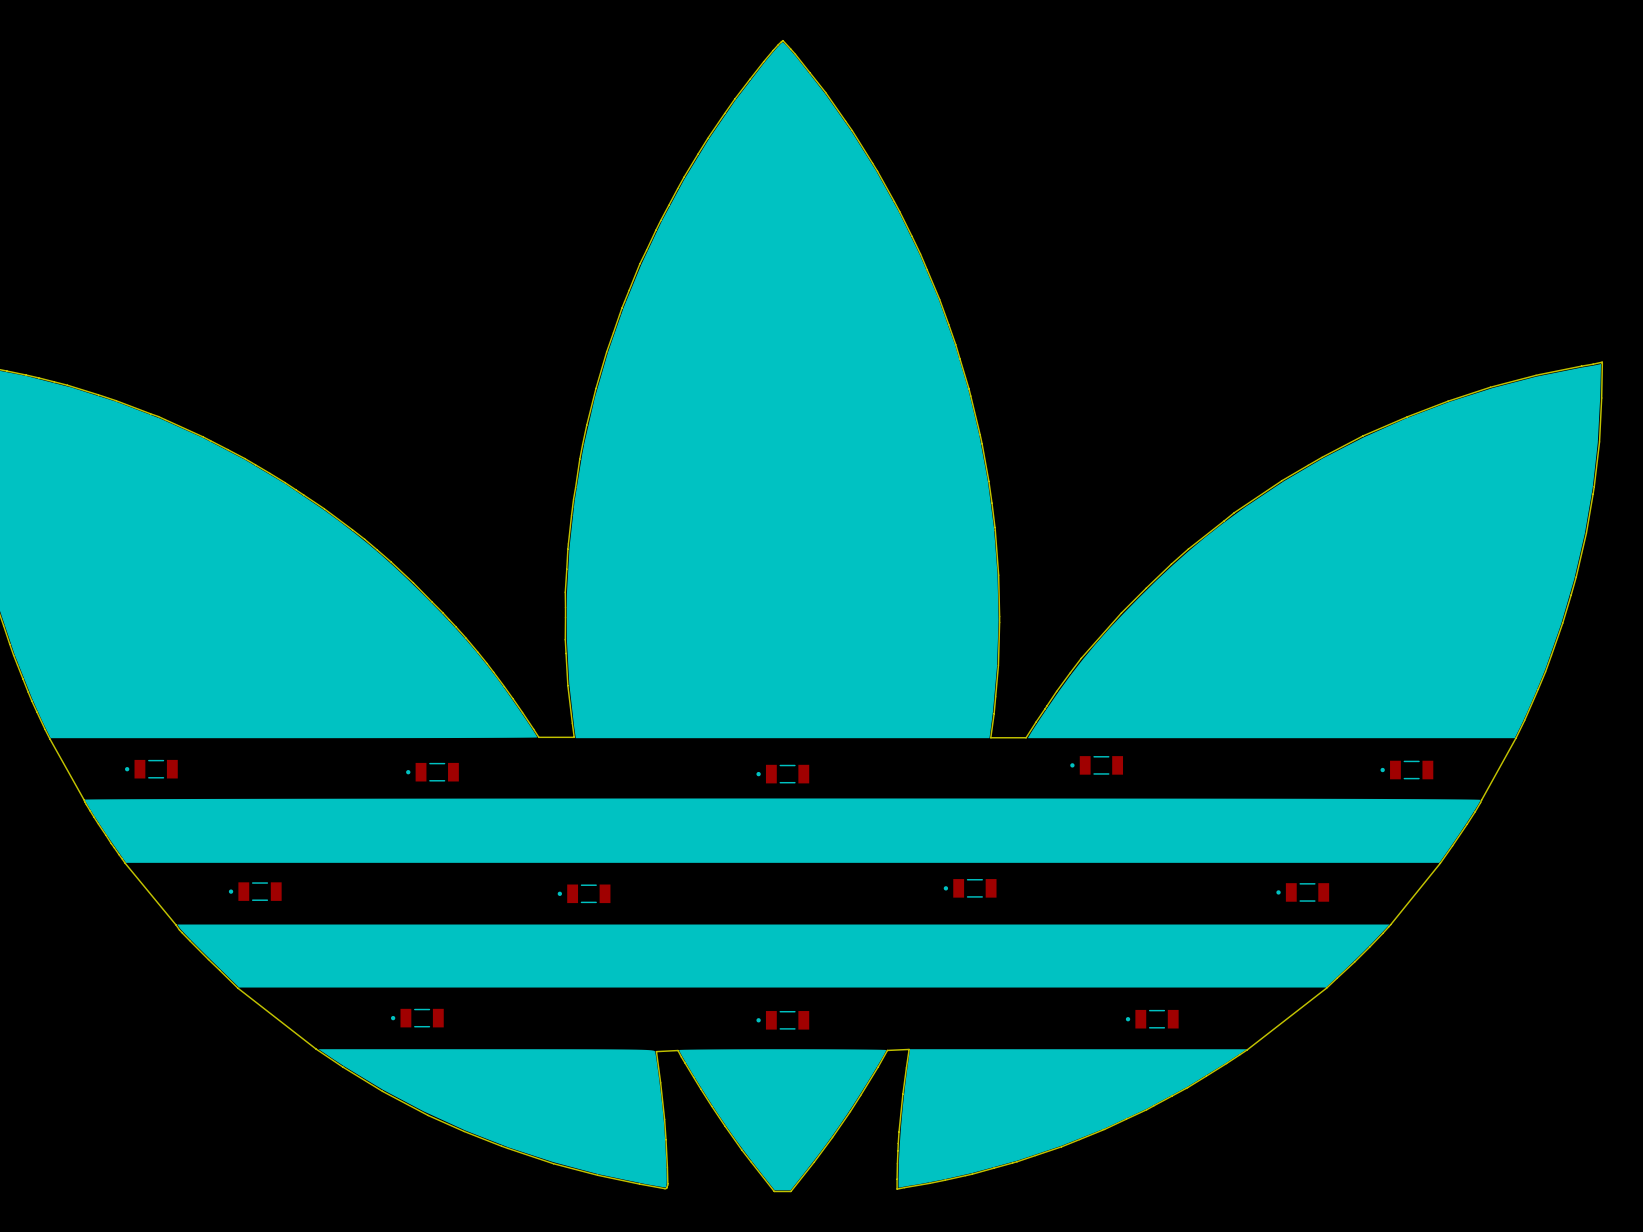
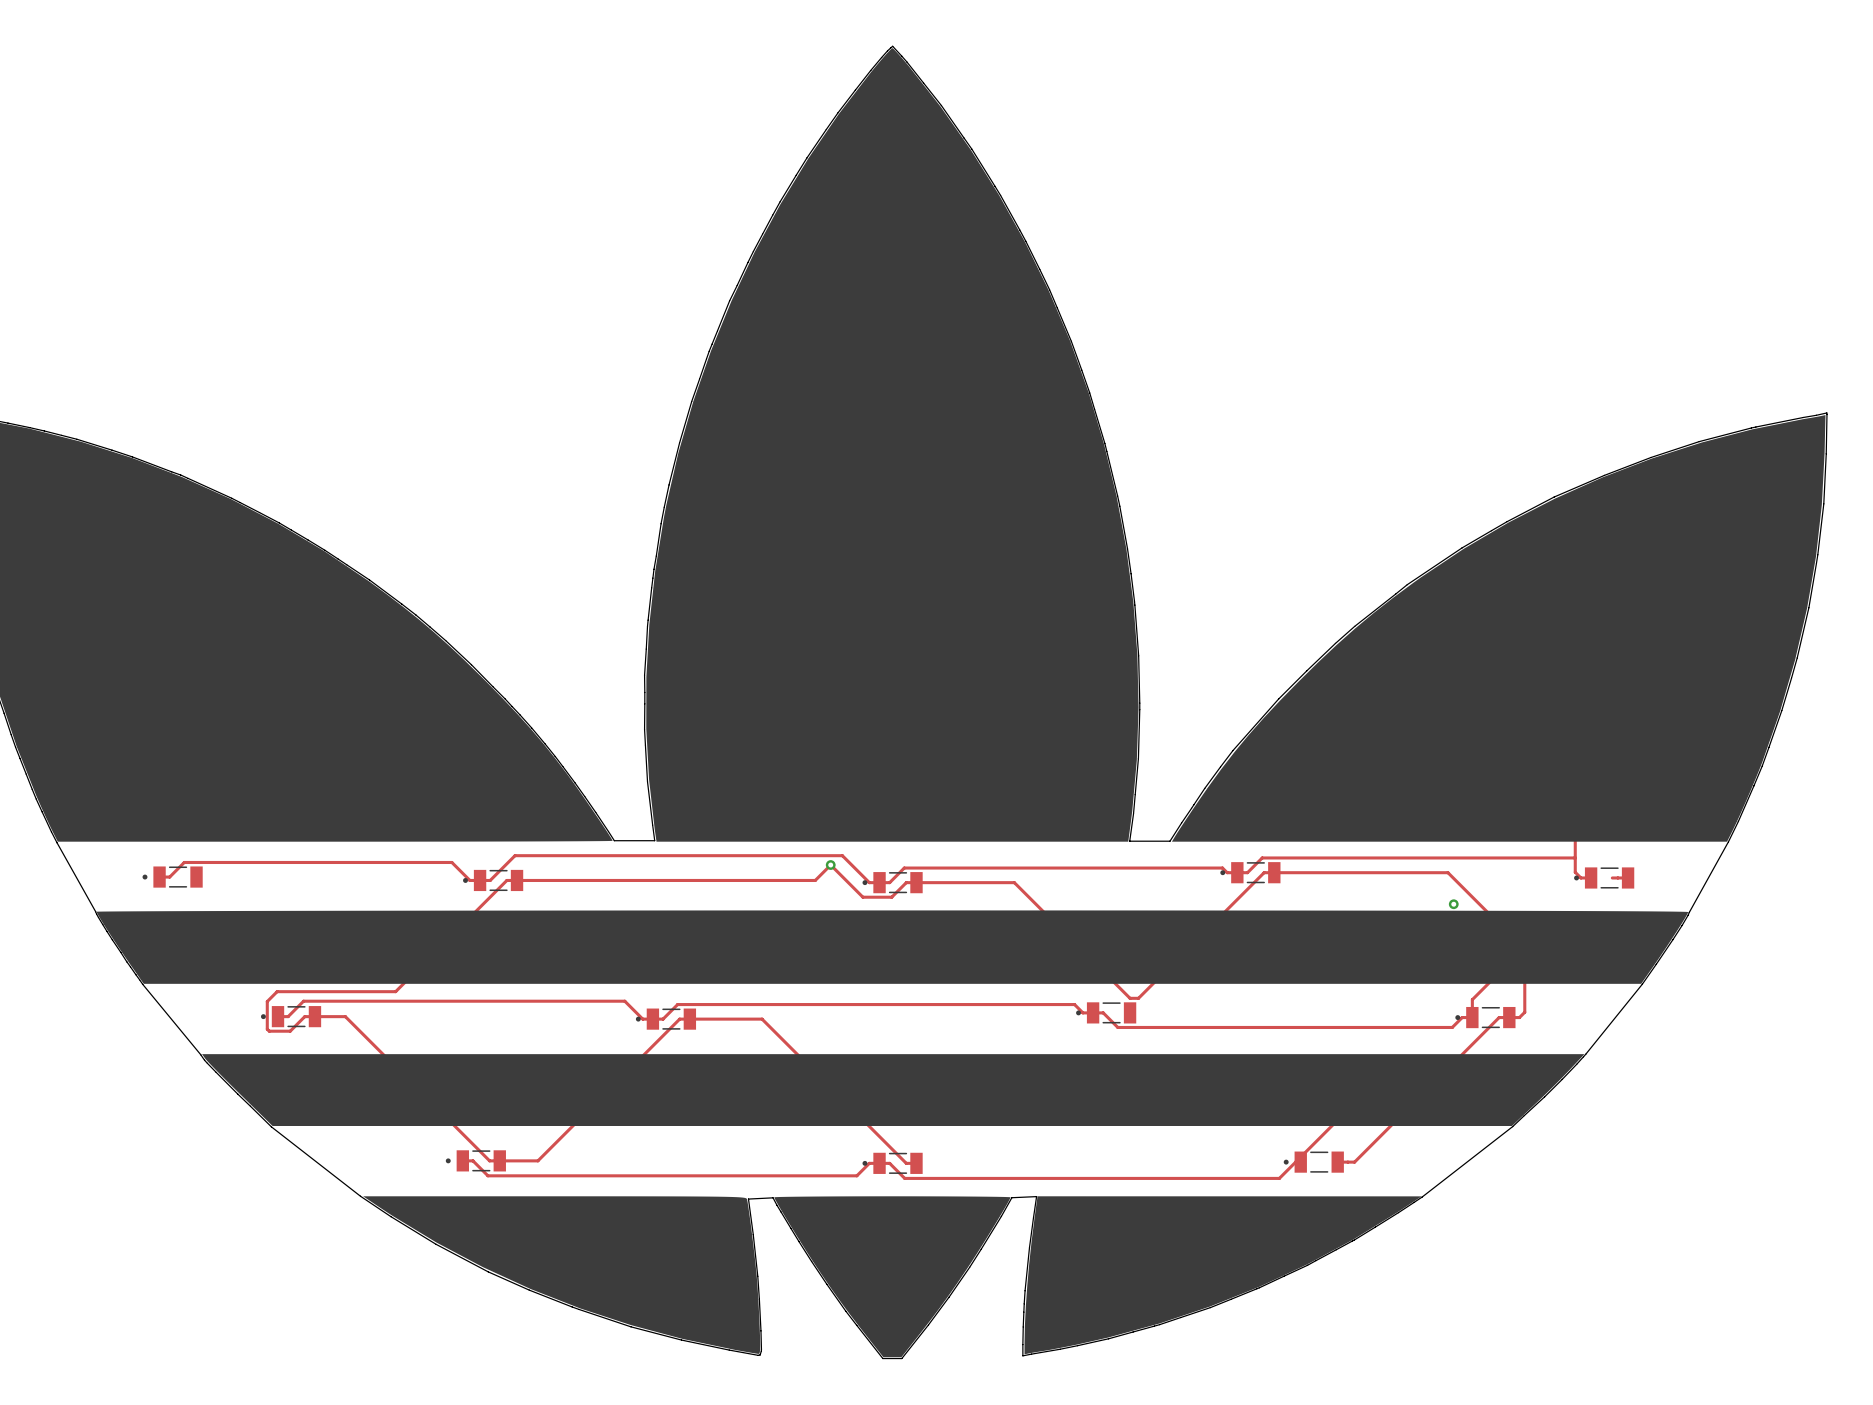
top track: none -> (1587, 811) (1575, 824) (1575, 872) (1580, 877) (1591, 877)
top track: none -> (1575, 857) (1262, 857) (1247, 872) (1227, 872) (1222, 868) (904, 868) (889, 882) (869, 882) (842, 855) (515, 855) (490, 880) (469, 880) (451, 862) (184, 862) (169, 877) (159, 877)
via: none -> (830, 865)
top track: none -> (1612, 877) (1628, 877)
via: none -> (1453, 904)
top track: none -> (1512, 959) (1472, 999) (1472, 1017) (1462, 1017) (1452, 1027) (1117, 1027) (1103, 1012) (1082, 1012) (1074, 1004) (677, 1004) (663, 1019) (642, 1019) (624, 1001) (303, 1001) (288, 1016) (278, 1016)
top track: none -> (1337, 1090) (1337, 1120) (1279, 1178) (904, 1178) (889, 1163) (869, 1163) (856, 1175) (487, 1175) (472, 1160) (462, 1160)
top track: none -> (1337, 1162) (1354, 1162) (1499, 1017) (1519, 1017) (1524, 1012) (1524, 949) (1447, 872) (1264, 872) (1138, 998) (1130, 998) (1014, 882) (906, 882) (891, 897) (862, 897) (830, 865) (815, 880) (506, 880) (395, 991) (277, 991) (267, 1001) (267, 1029) (269, 1031) (290, 1031) (304, 1016) (345, 1016) (489, 1160) (537, 1160) (679, 1019) (762, 1019) (906, 1163) (916, 1163)

